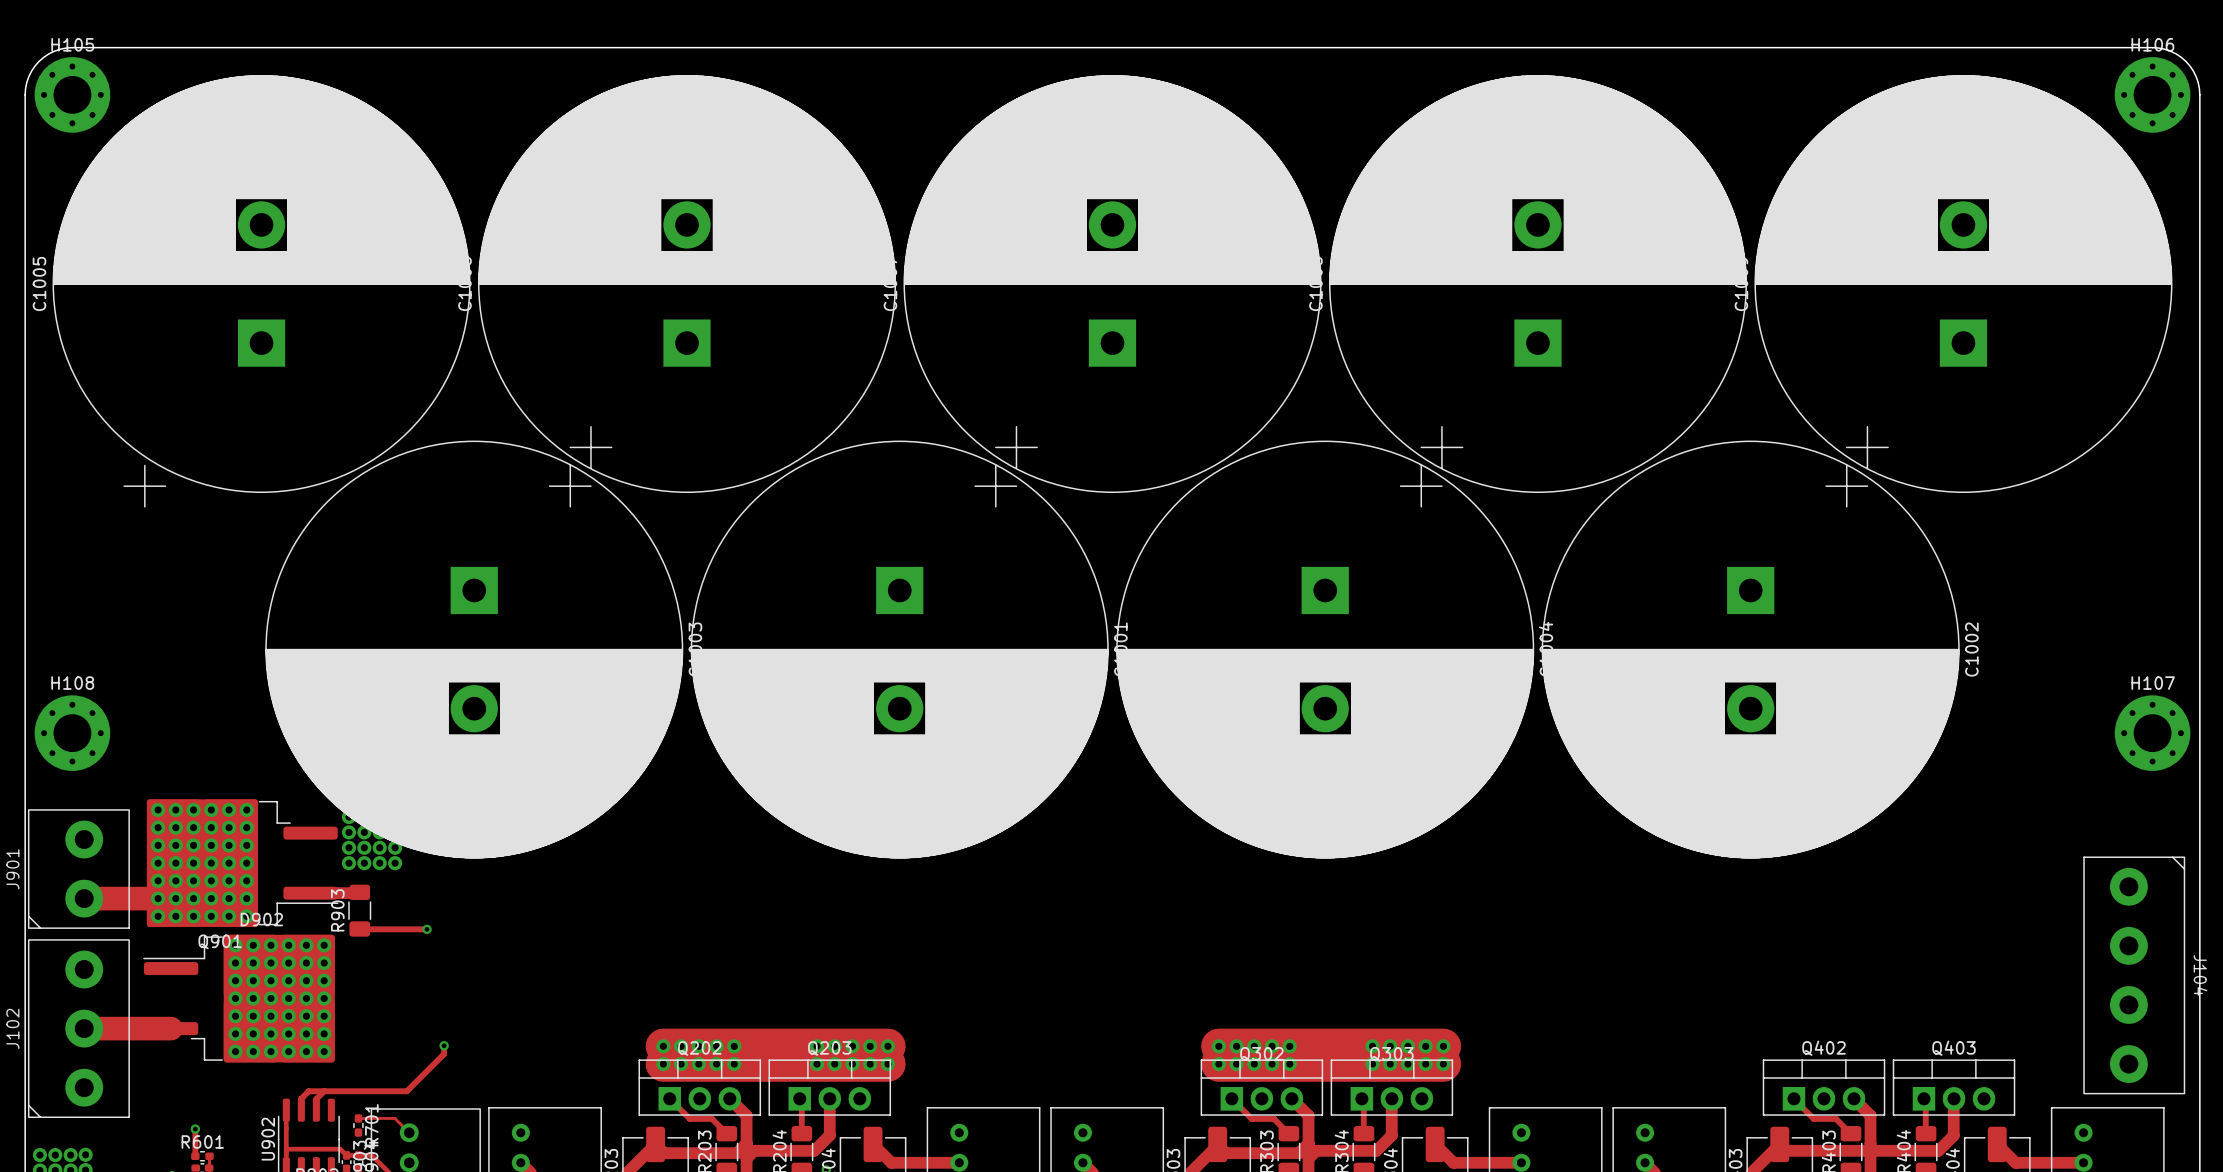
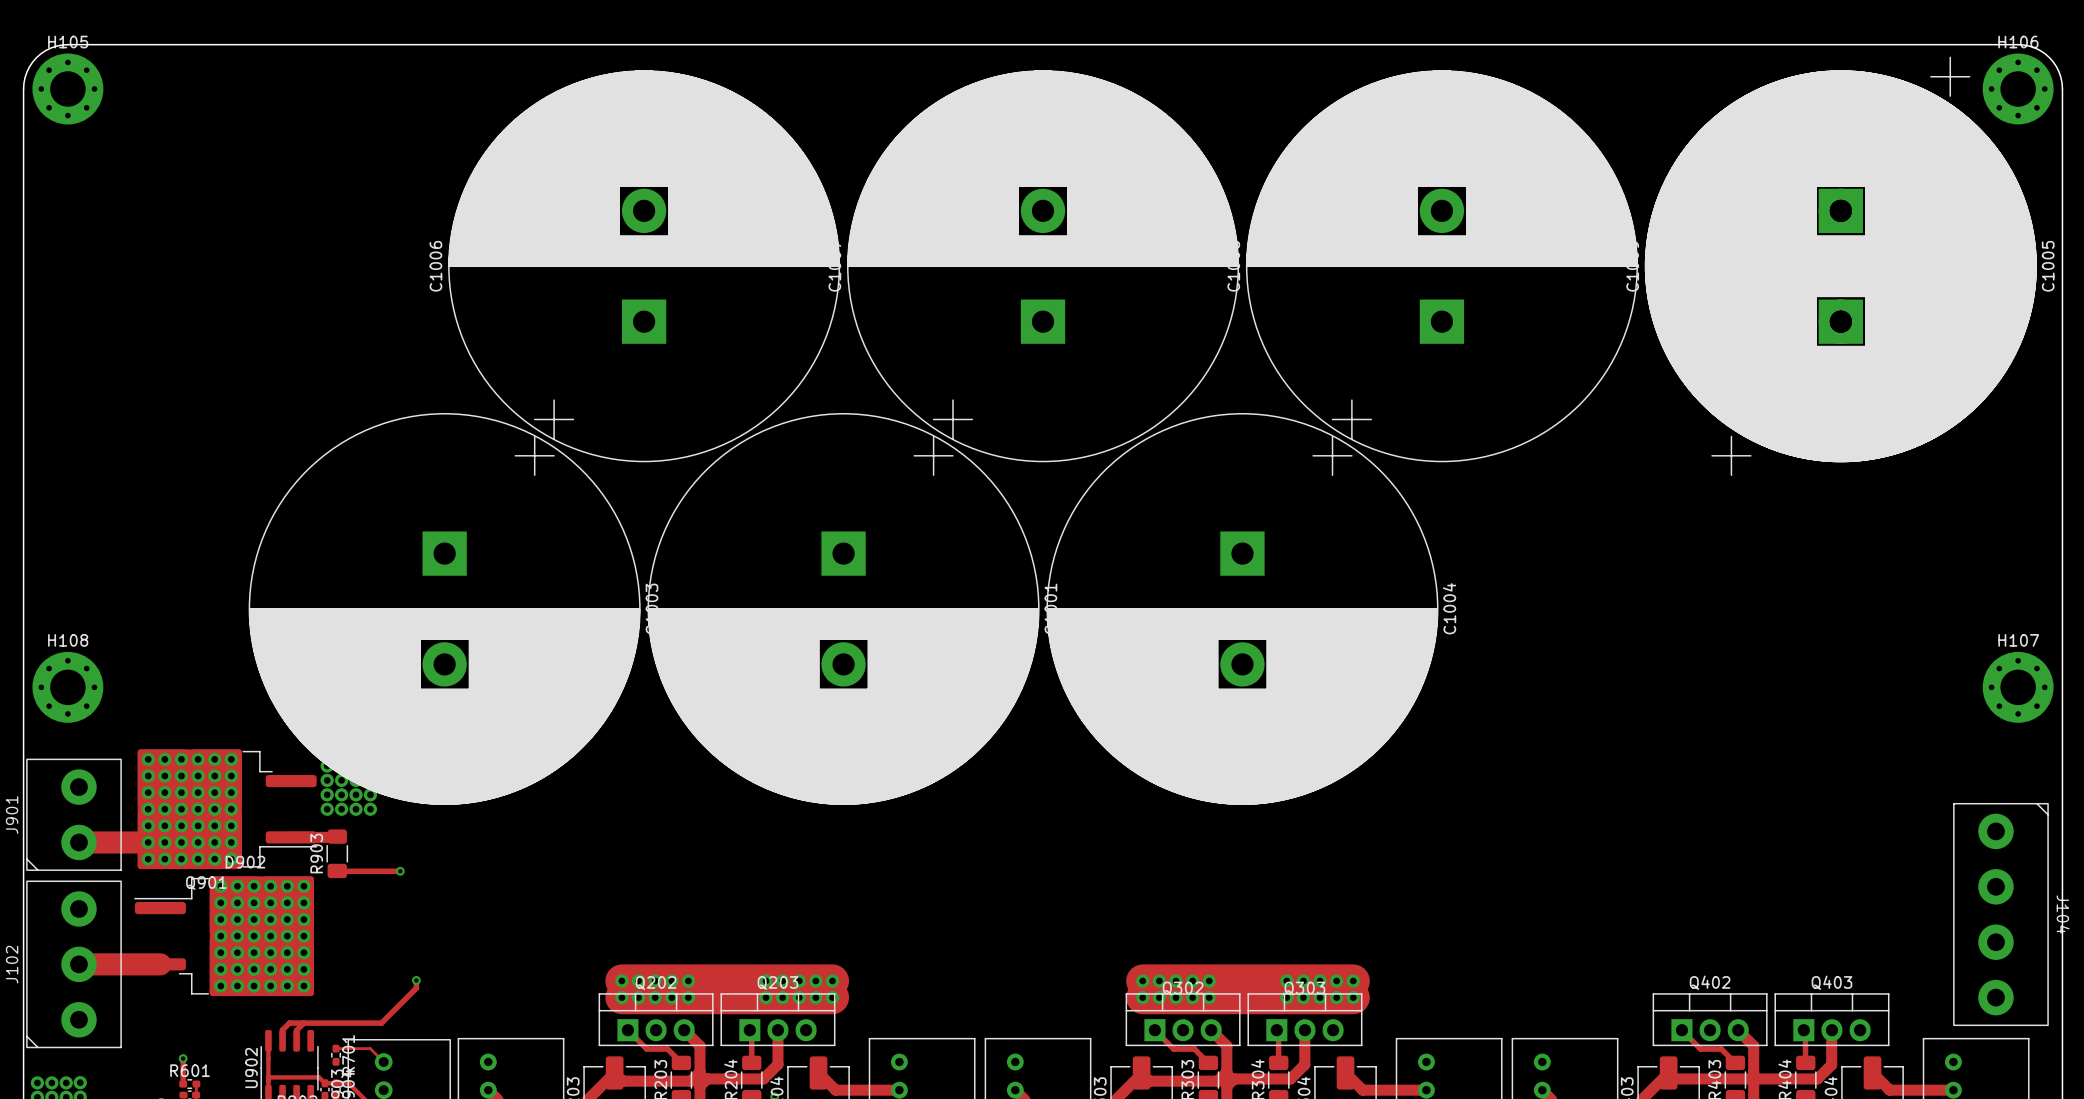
C1005 rotation: 0° (261, 291) -> 180° (1840, 259)
C1005 position: (261, 291) -> (1840, 259)
C1002: (1750, 642) -> none

